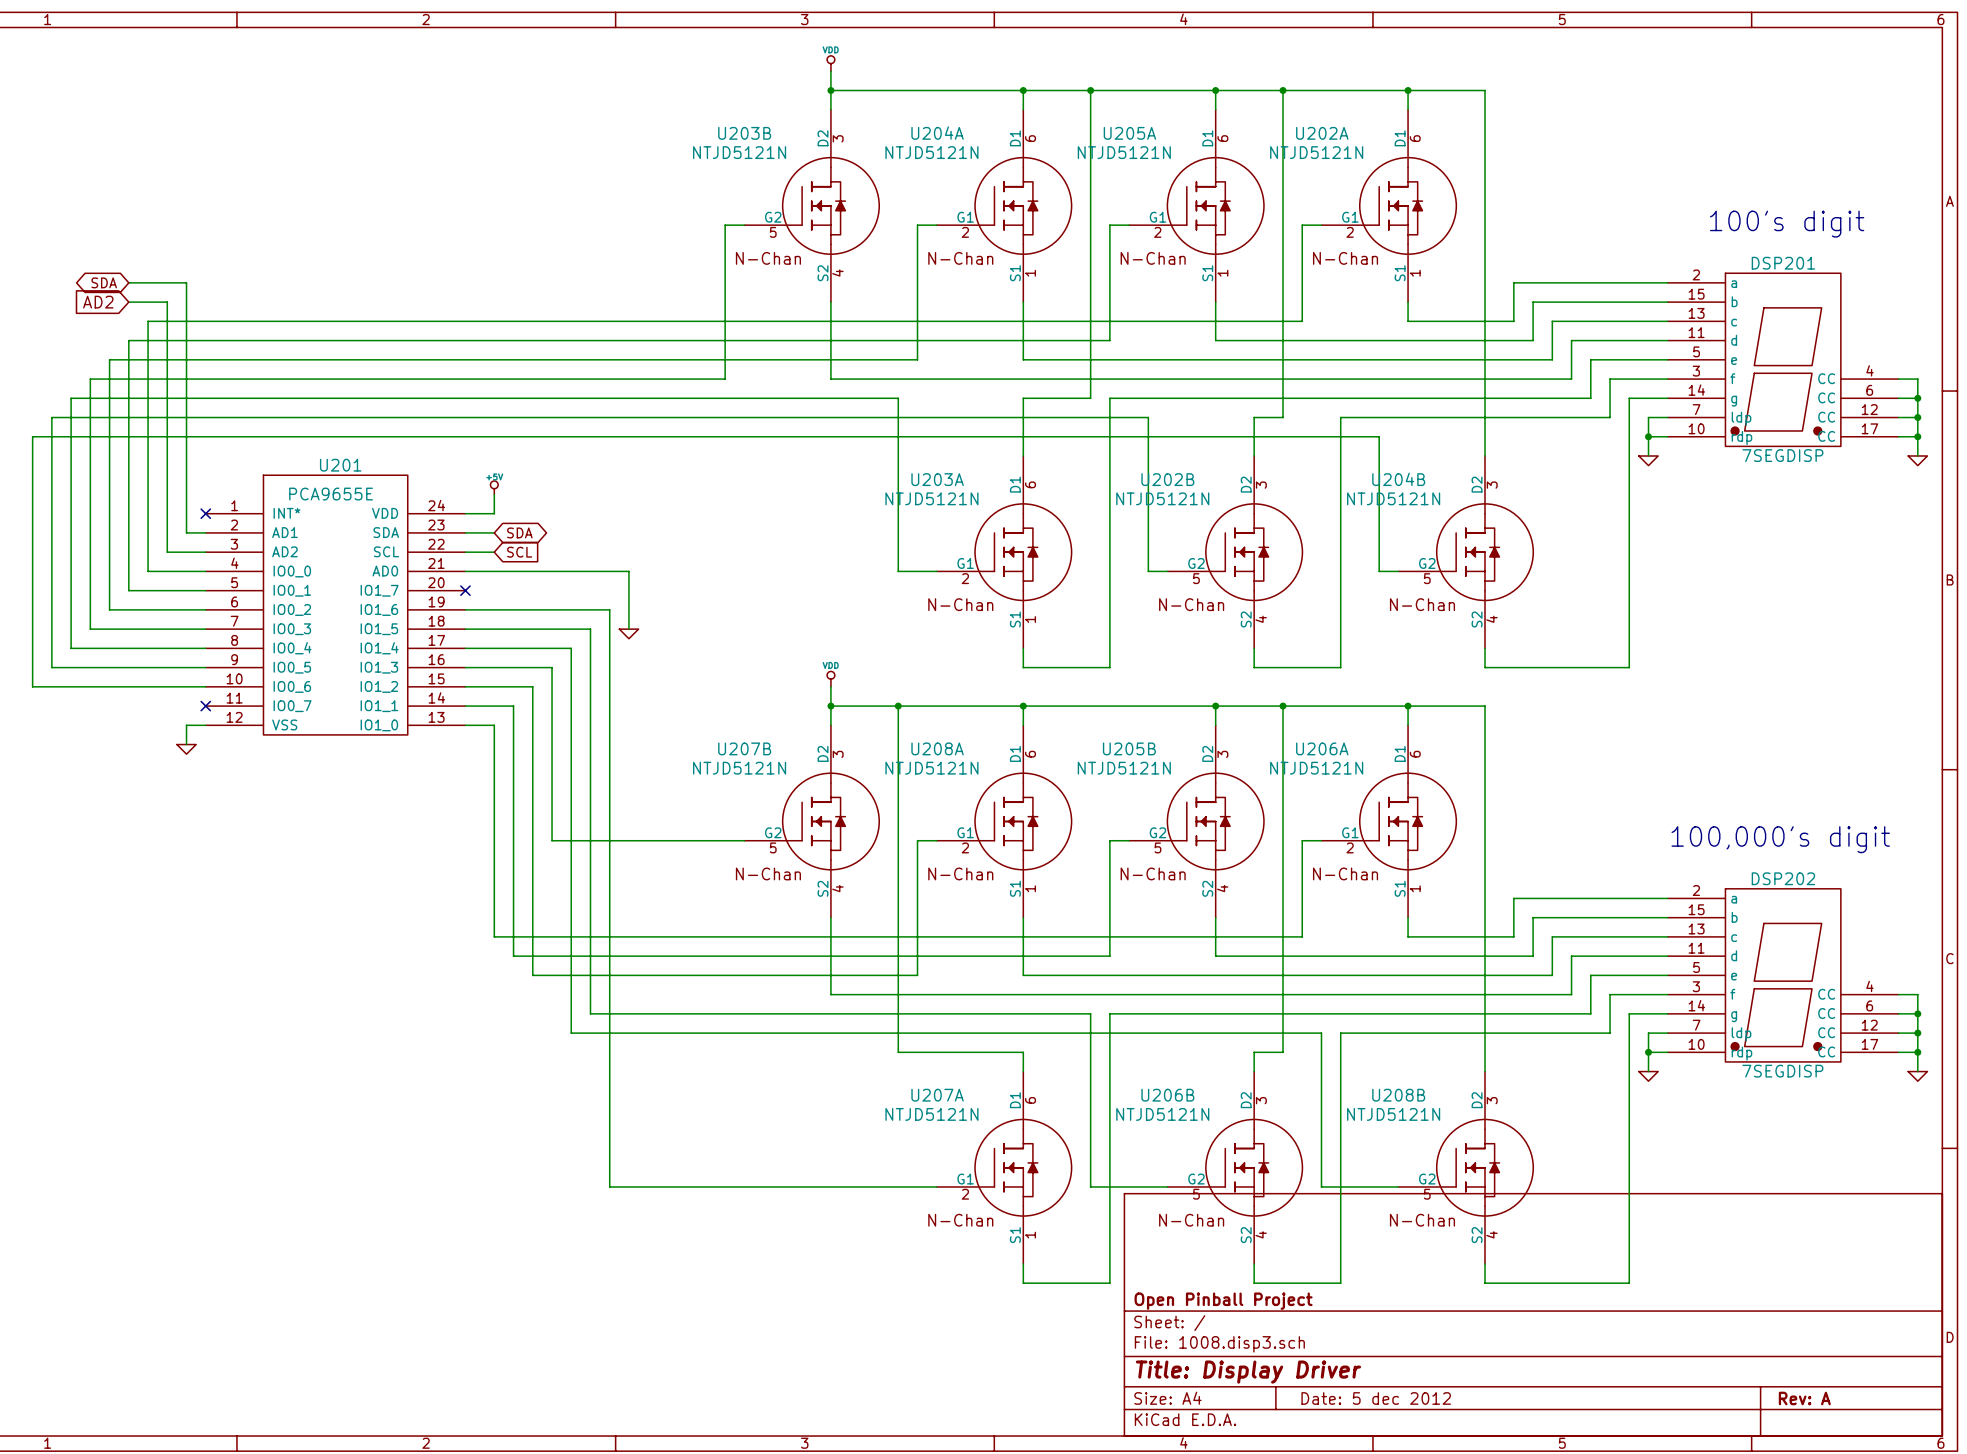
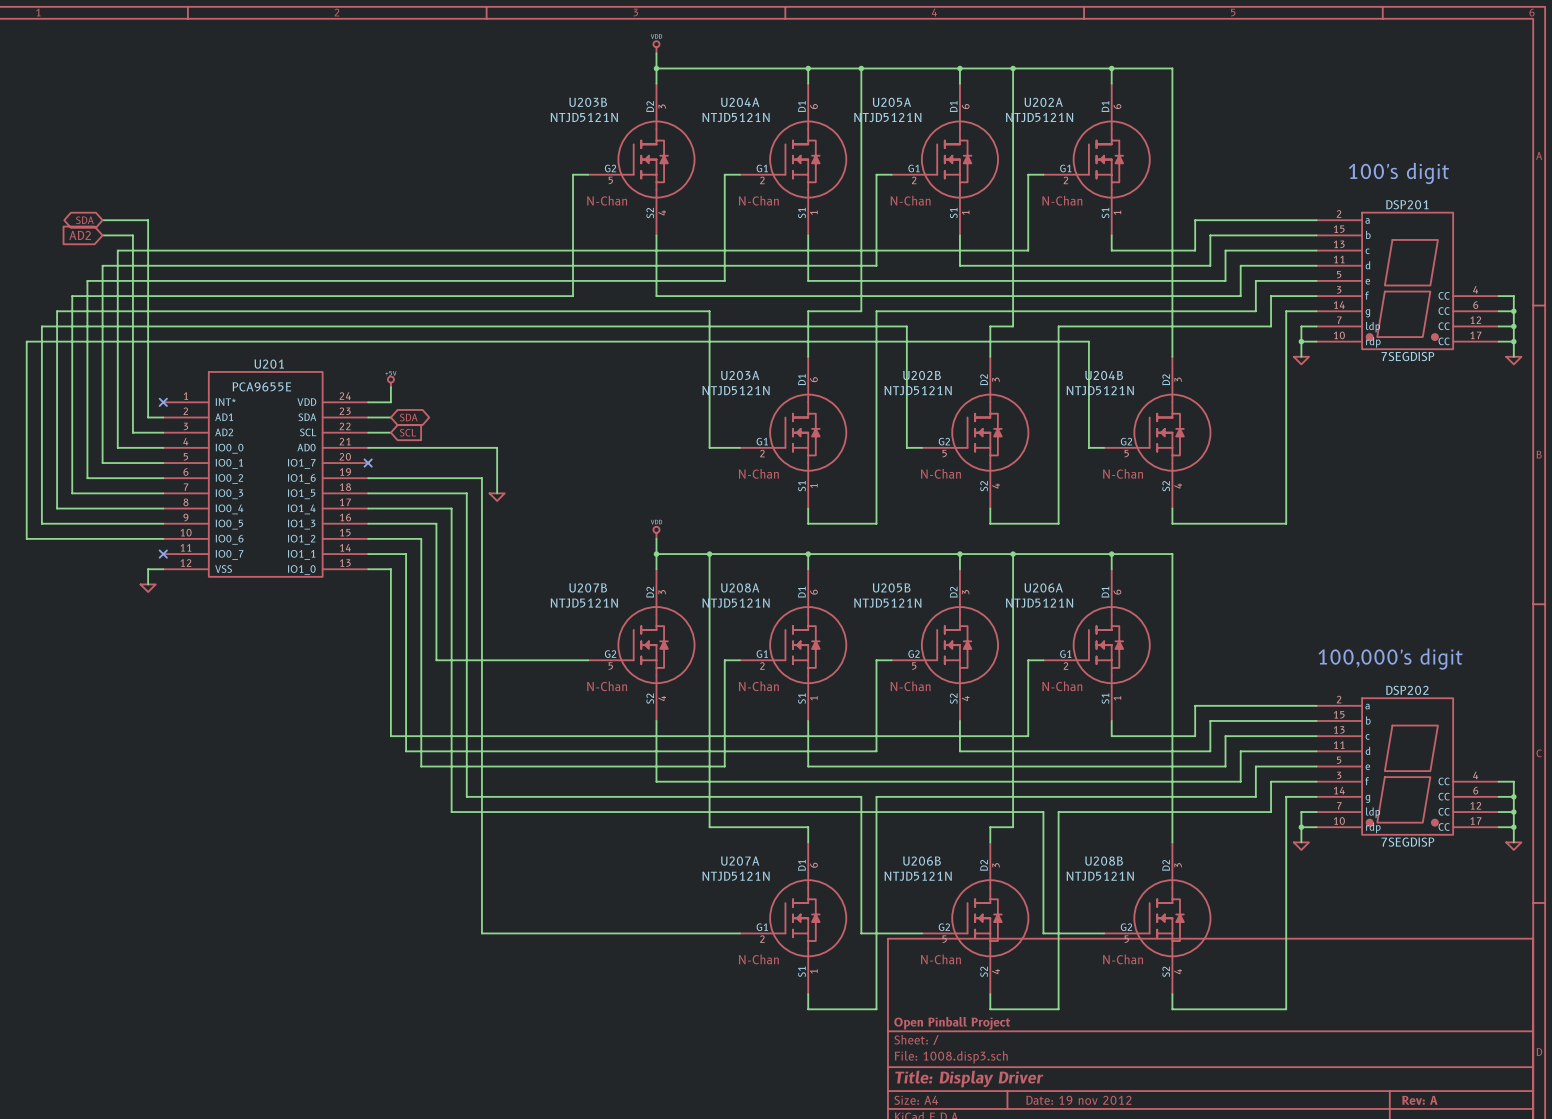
title block: Date: 5 dec 2012 (1376, 1398) -> Date: 19 nov 2012 (1078, 1100)

